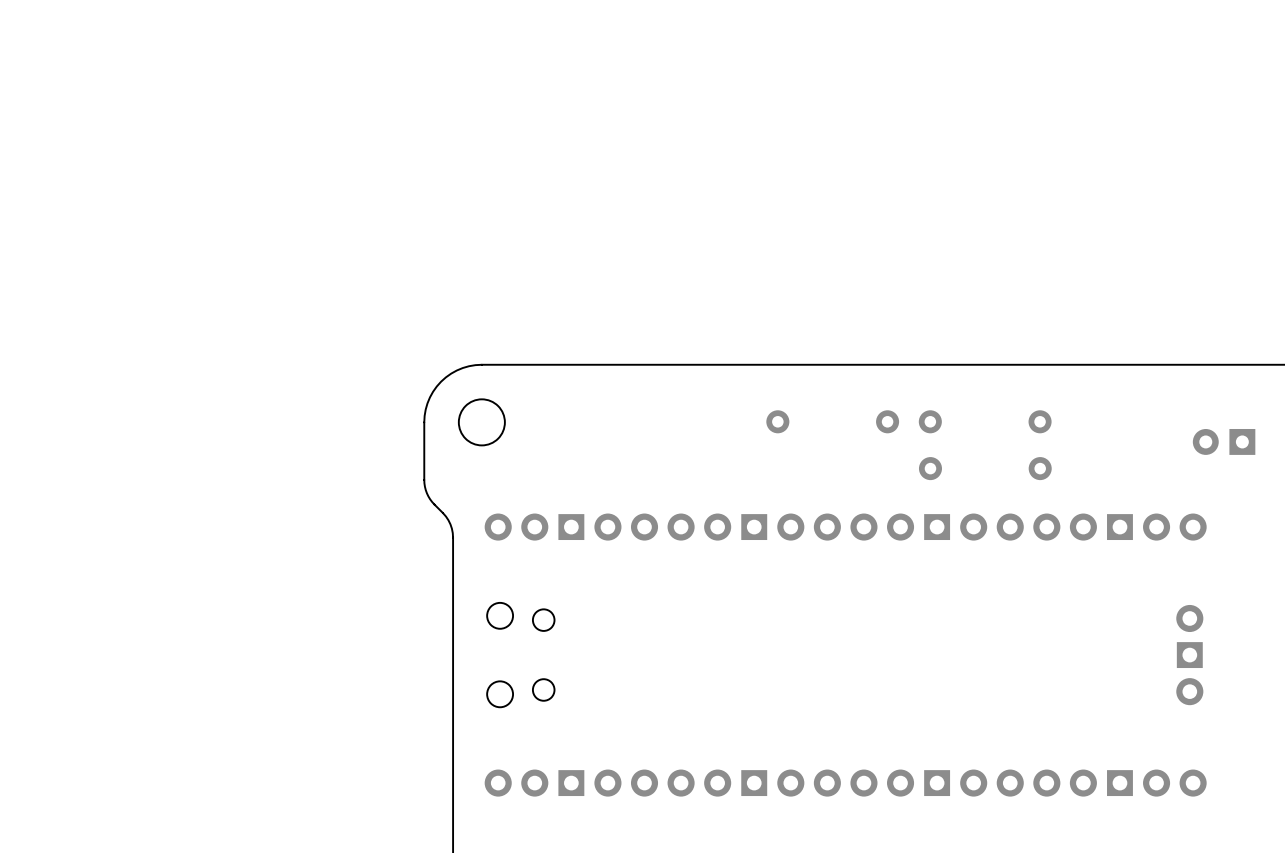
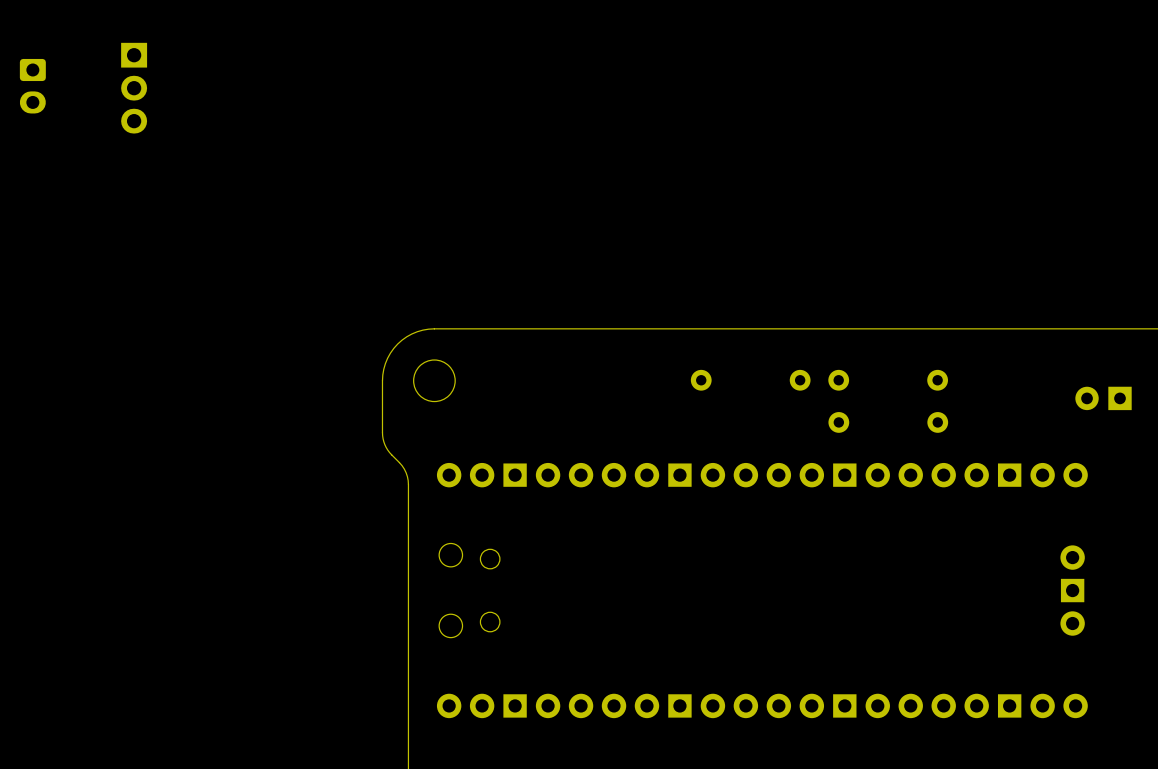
part: none -> (32, 86)
part: none -> (134, 88)

